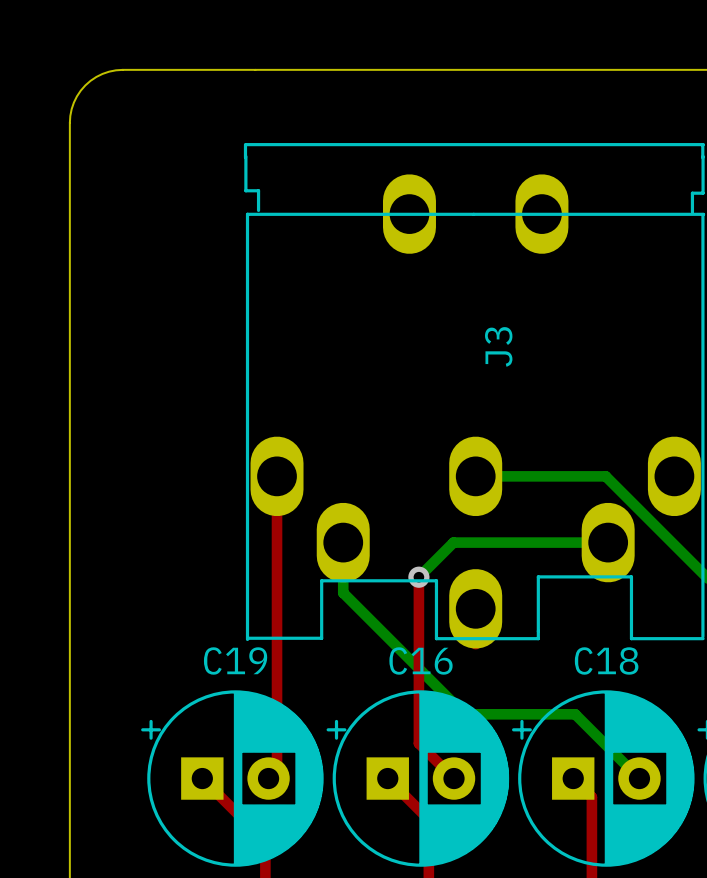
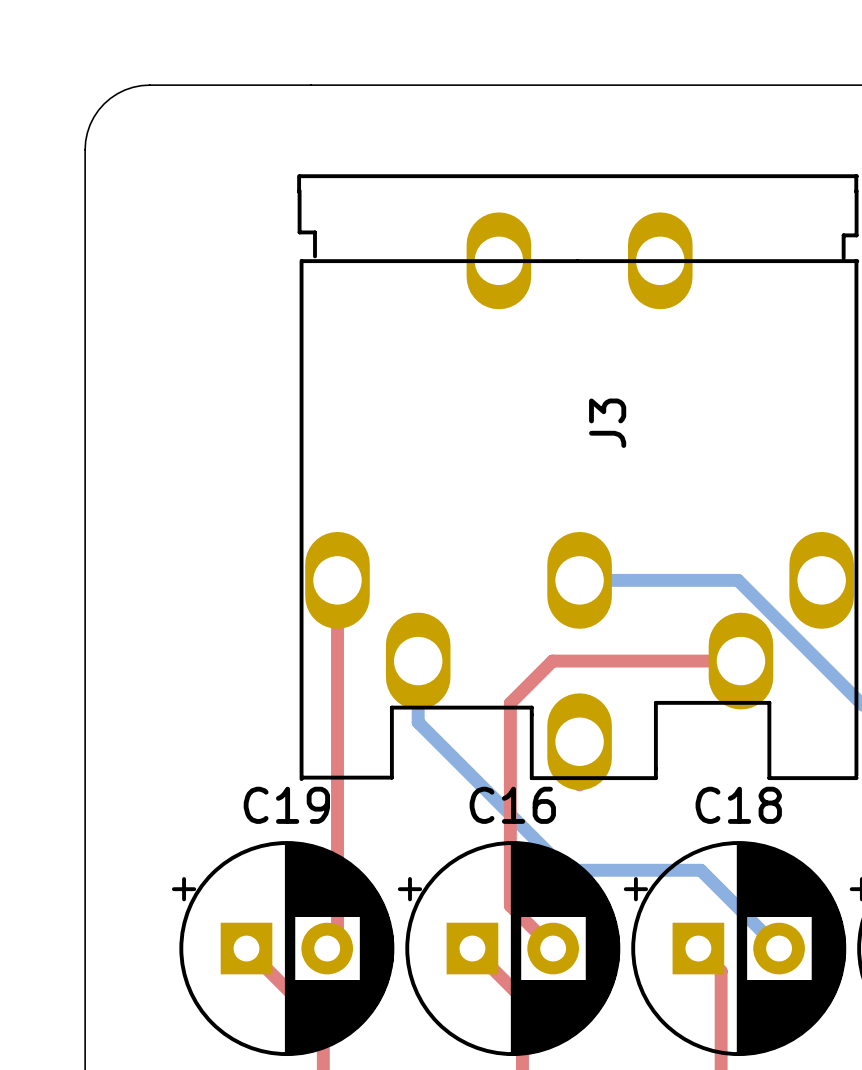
top track: none -> (740, 661) (552, 661) (510, 703)
bottom track: (608, 542) (453, 542) (418, 577) -> none
via: (418, 577) -> none

